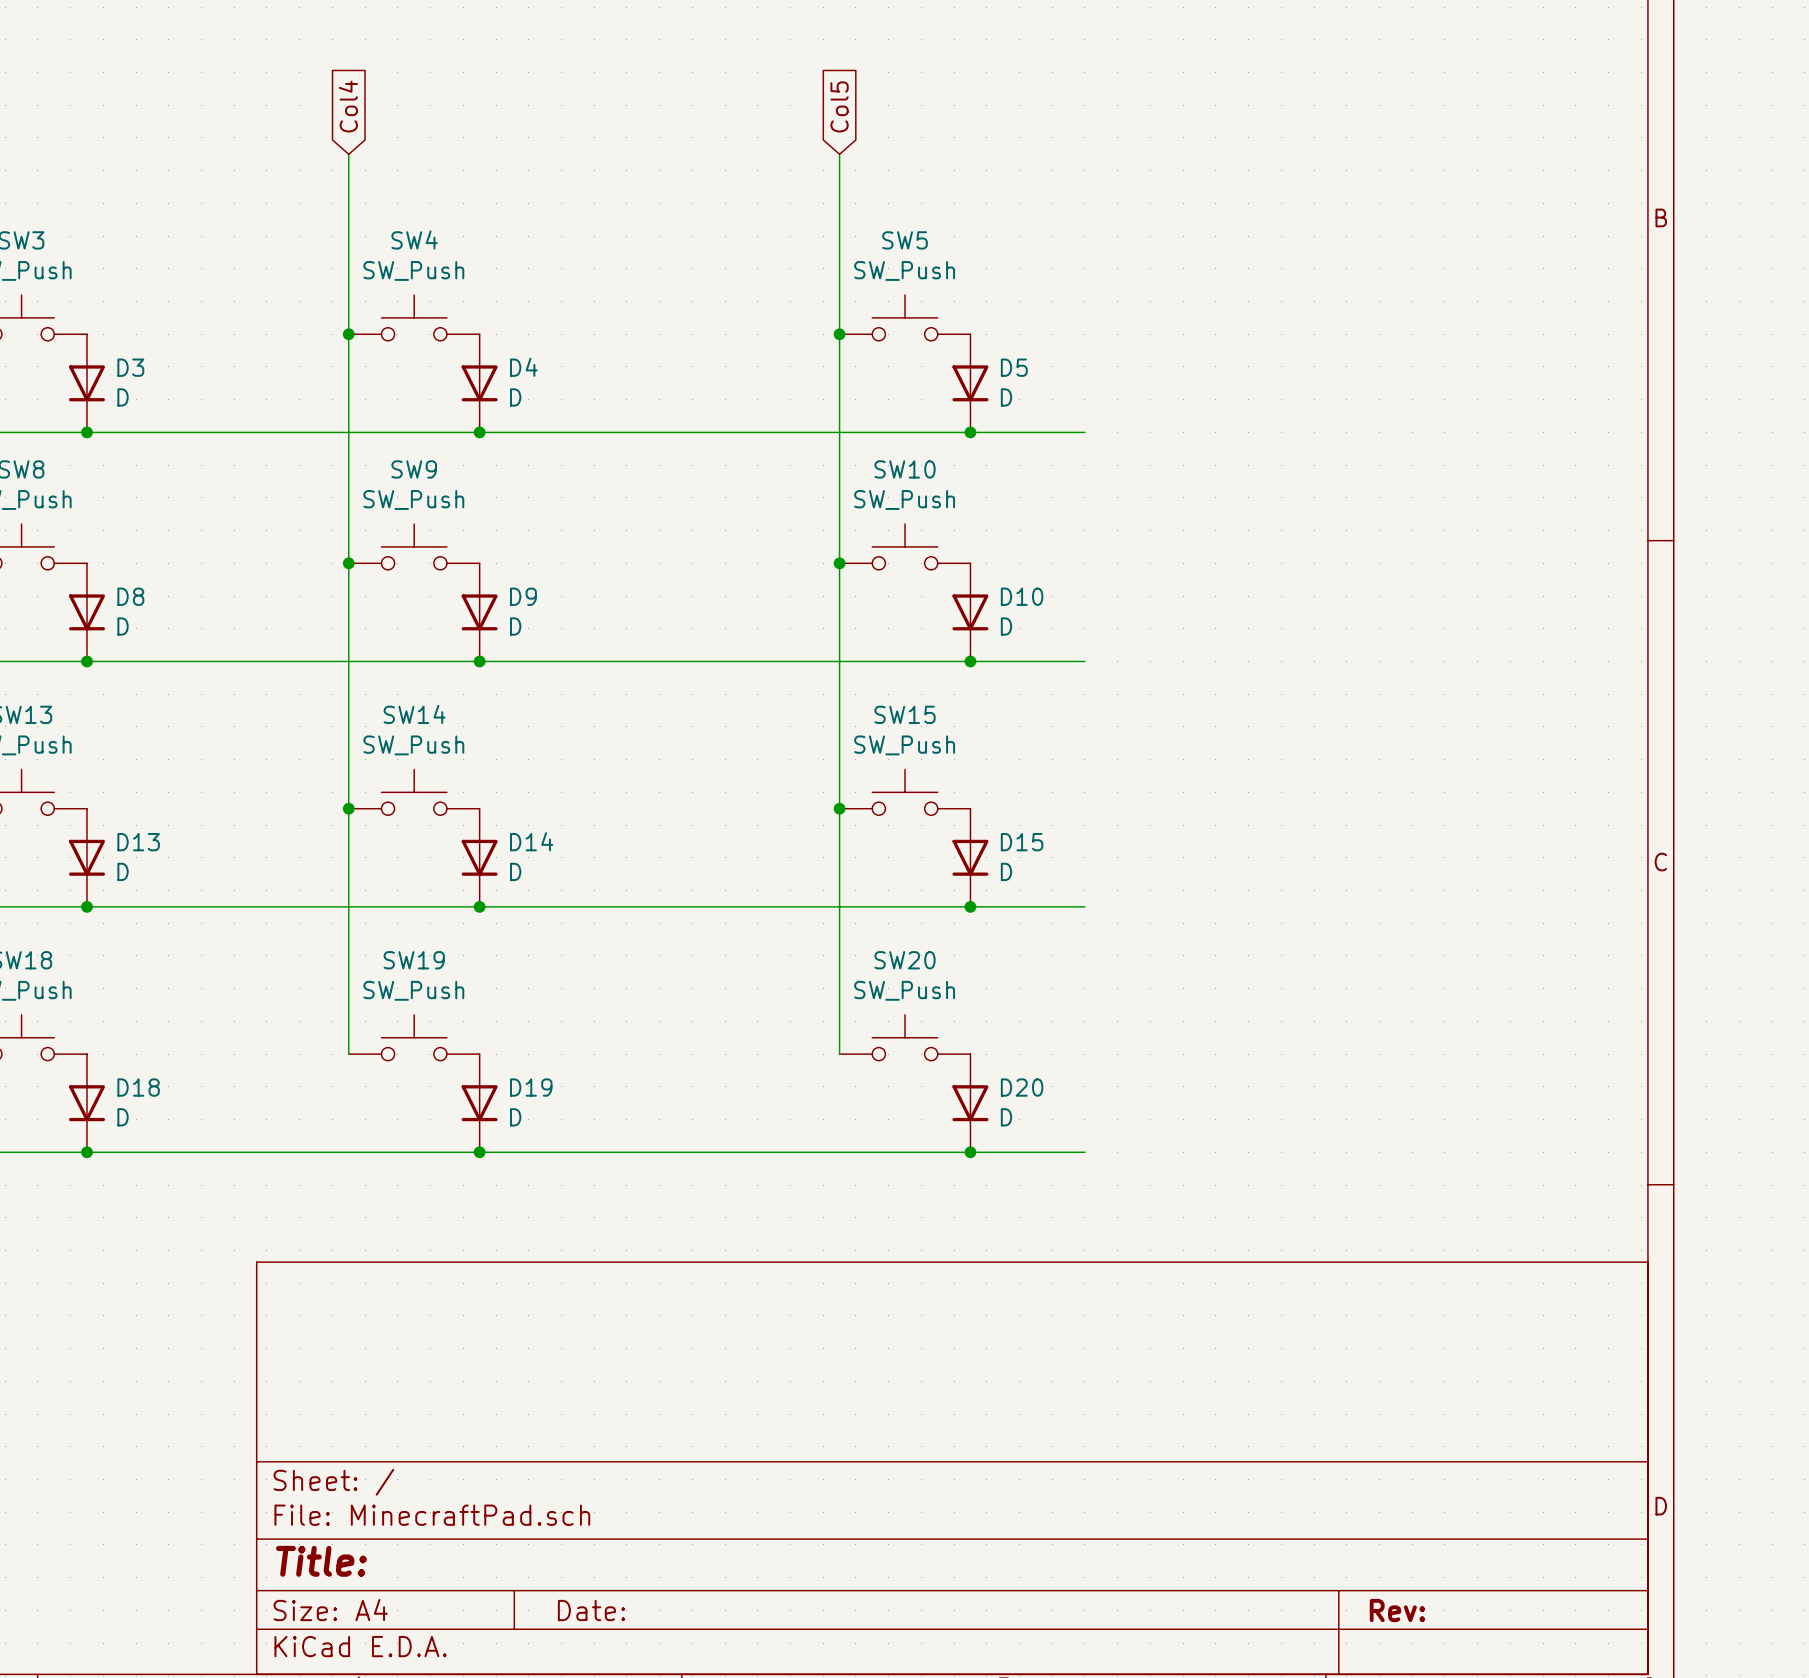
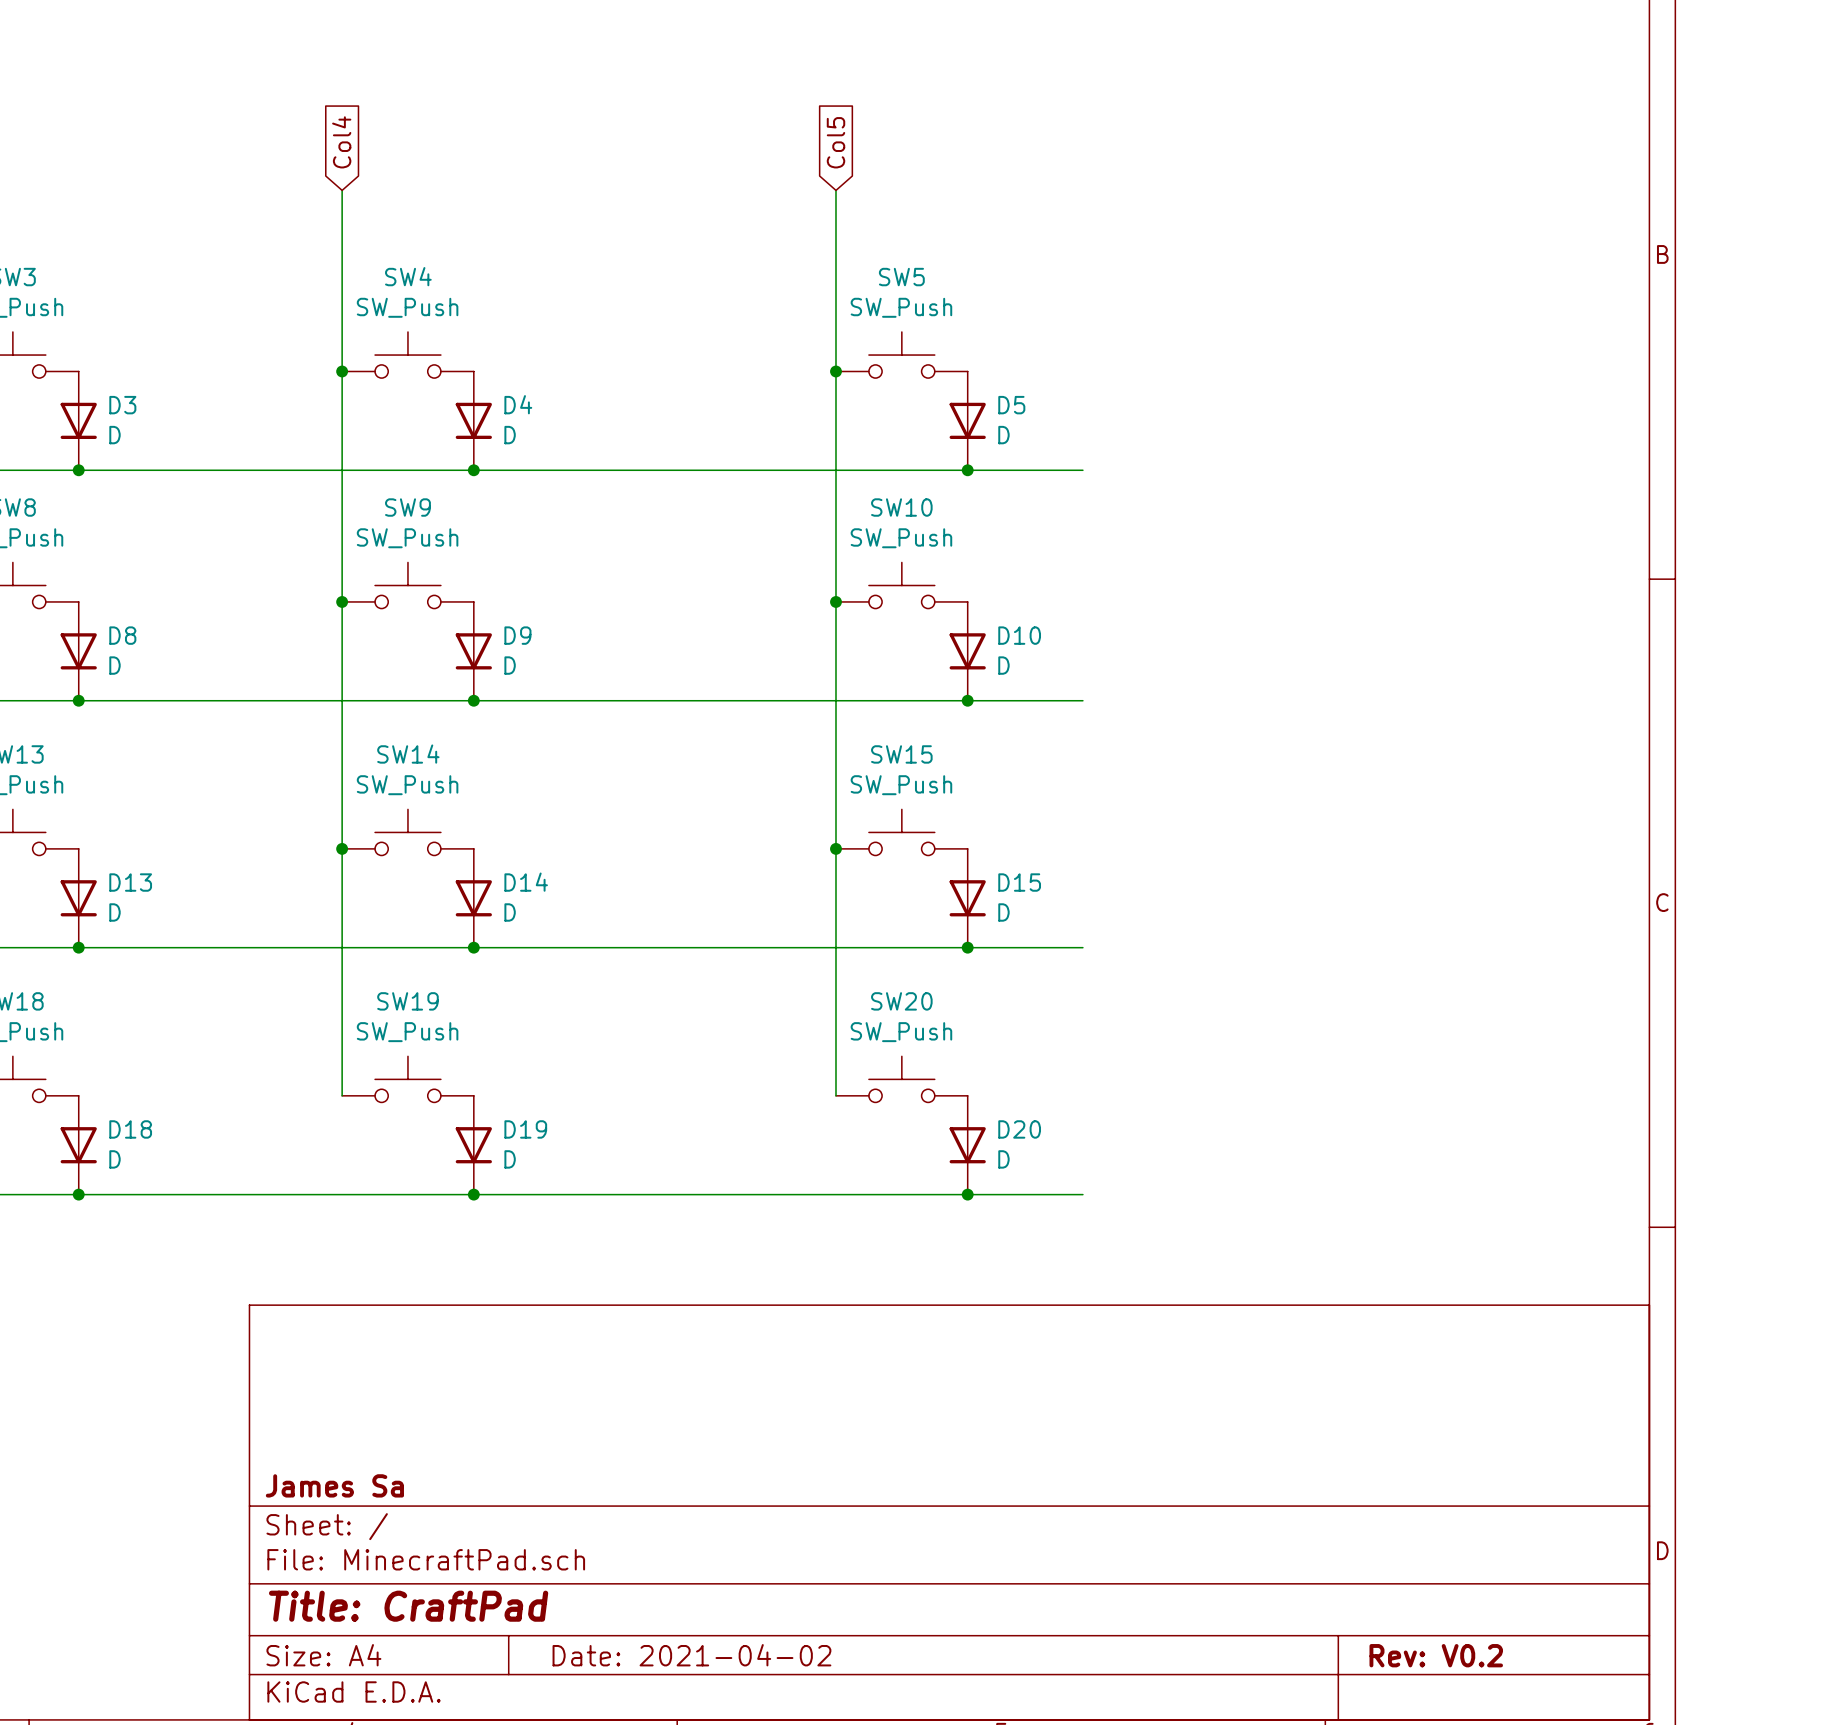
title block: none -> James Sa (334, 1485)
title block: Title: (321, 1561) -> Title: CraftPad (408, 1606)
title block: Date: (591, 1610) -> Date: 2021-04-02 (691, 1655)
title block: Rev: (1397, 1610) -> Rev: V0.2 (1436, 1655)

